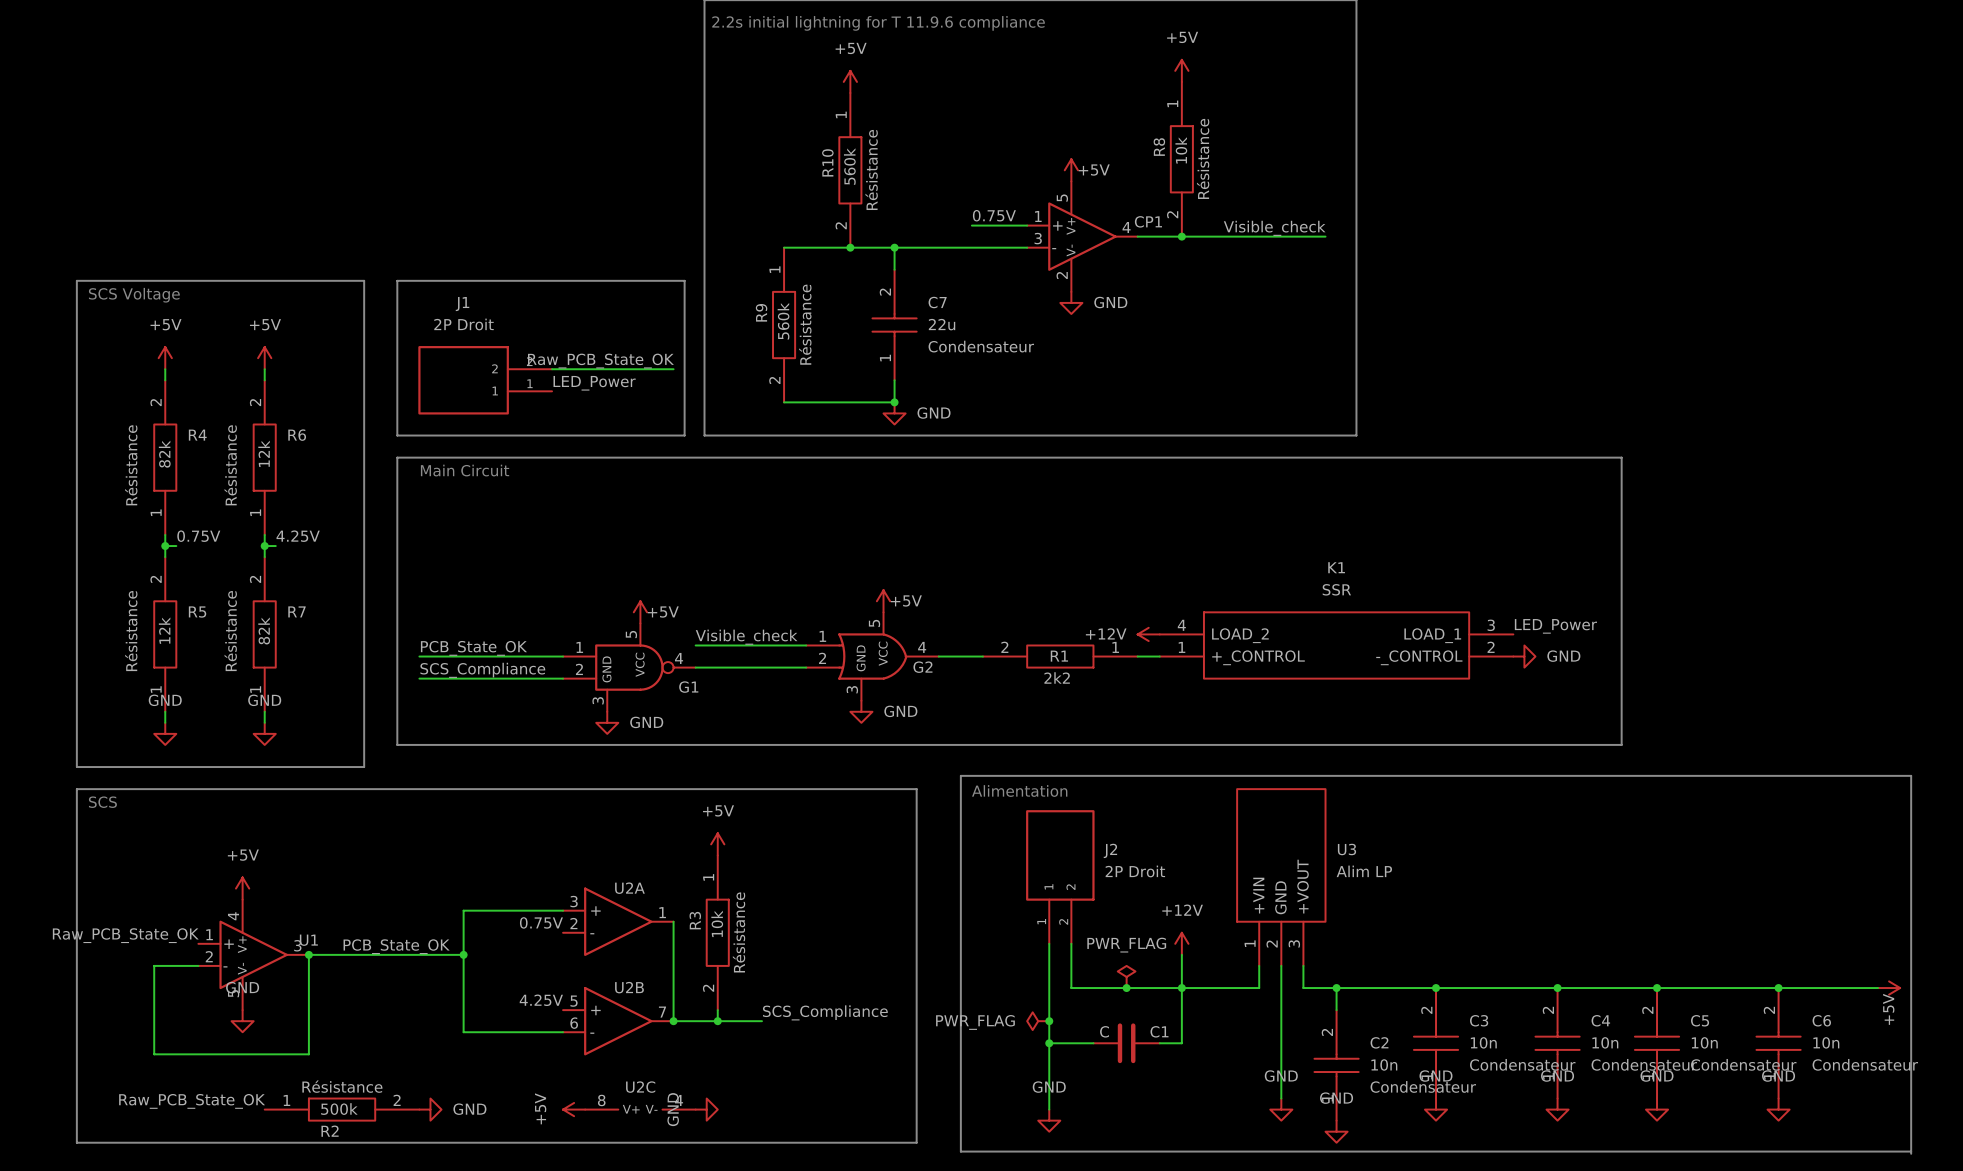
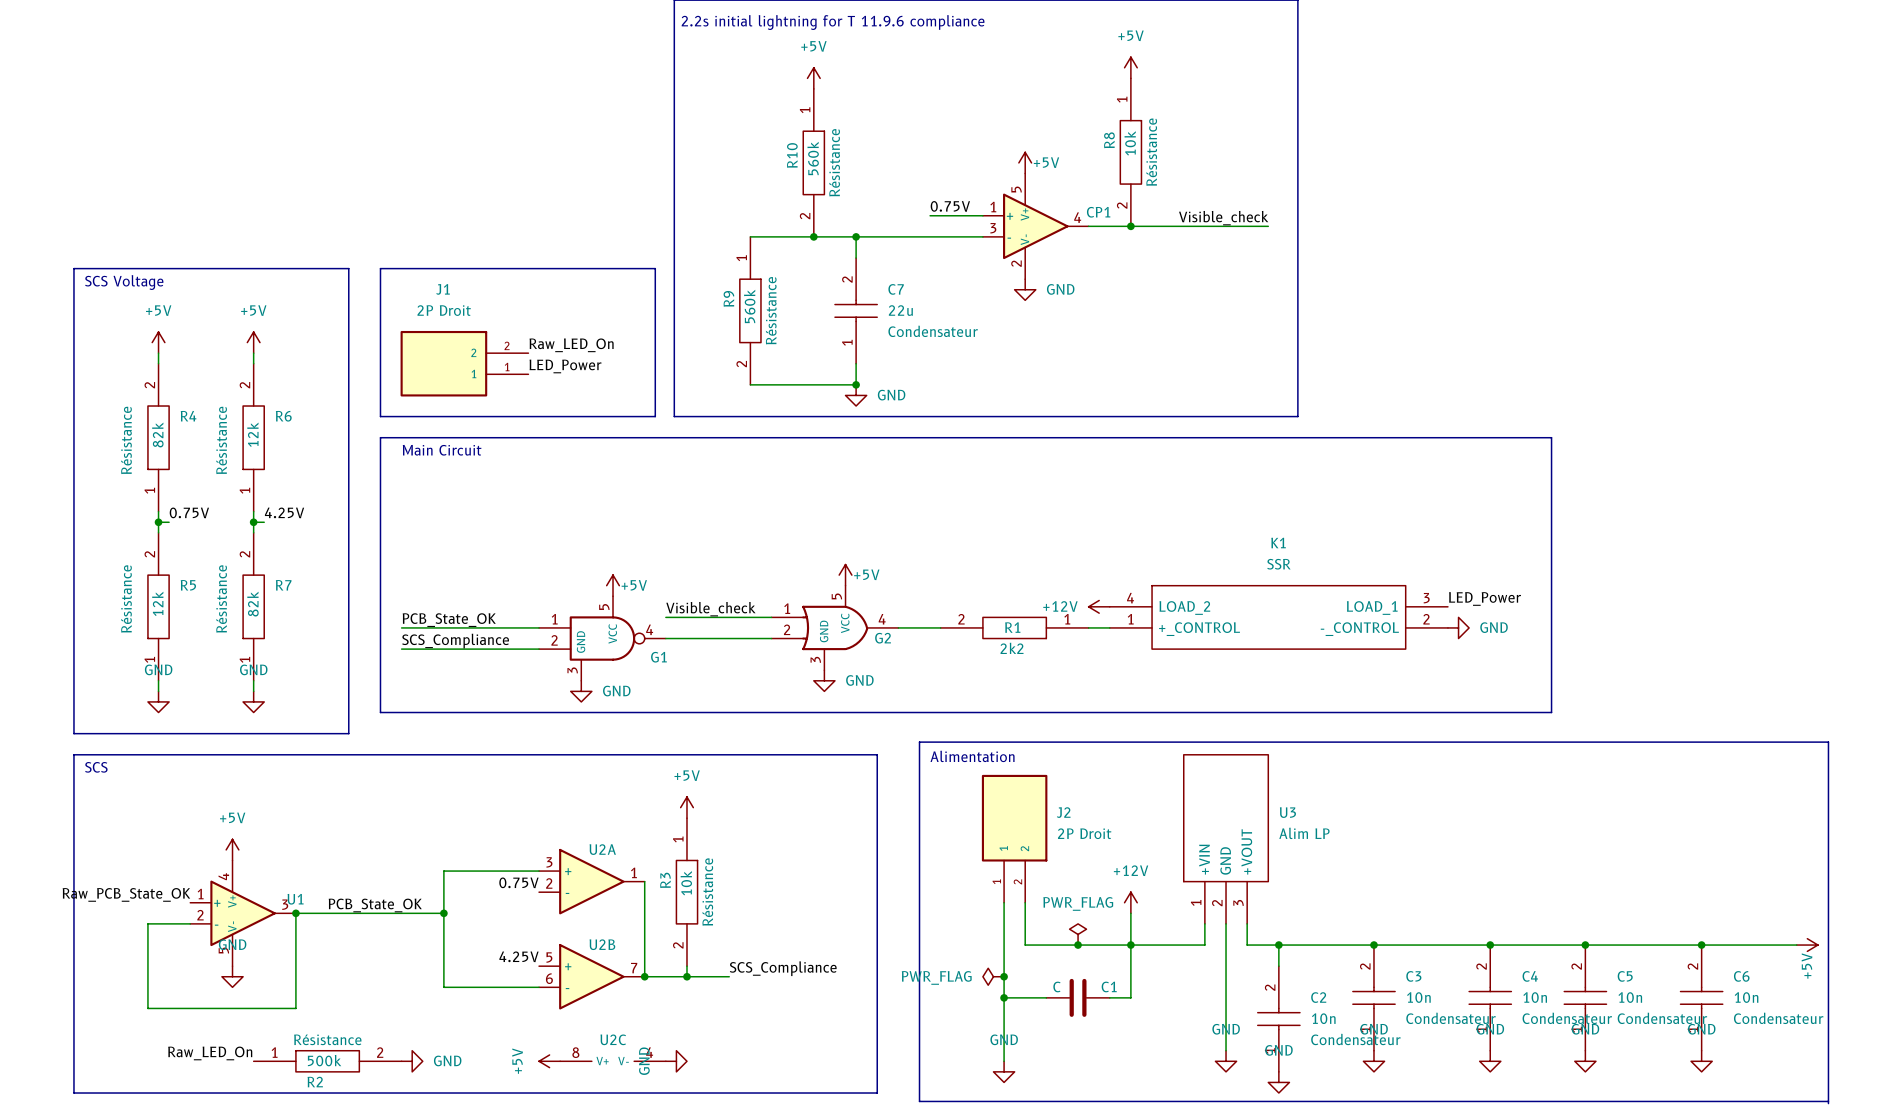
label: Raw_PCB_State_OK (600, 361) -> none
label: none -> Raw_LED_On (571, 345)
wire: (552, 369) (673, 369) -> none
label: Raw_PCB_State_OK (192, 1101) -> Raw_LED_On (210, 1053)

